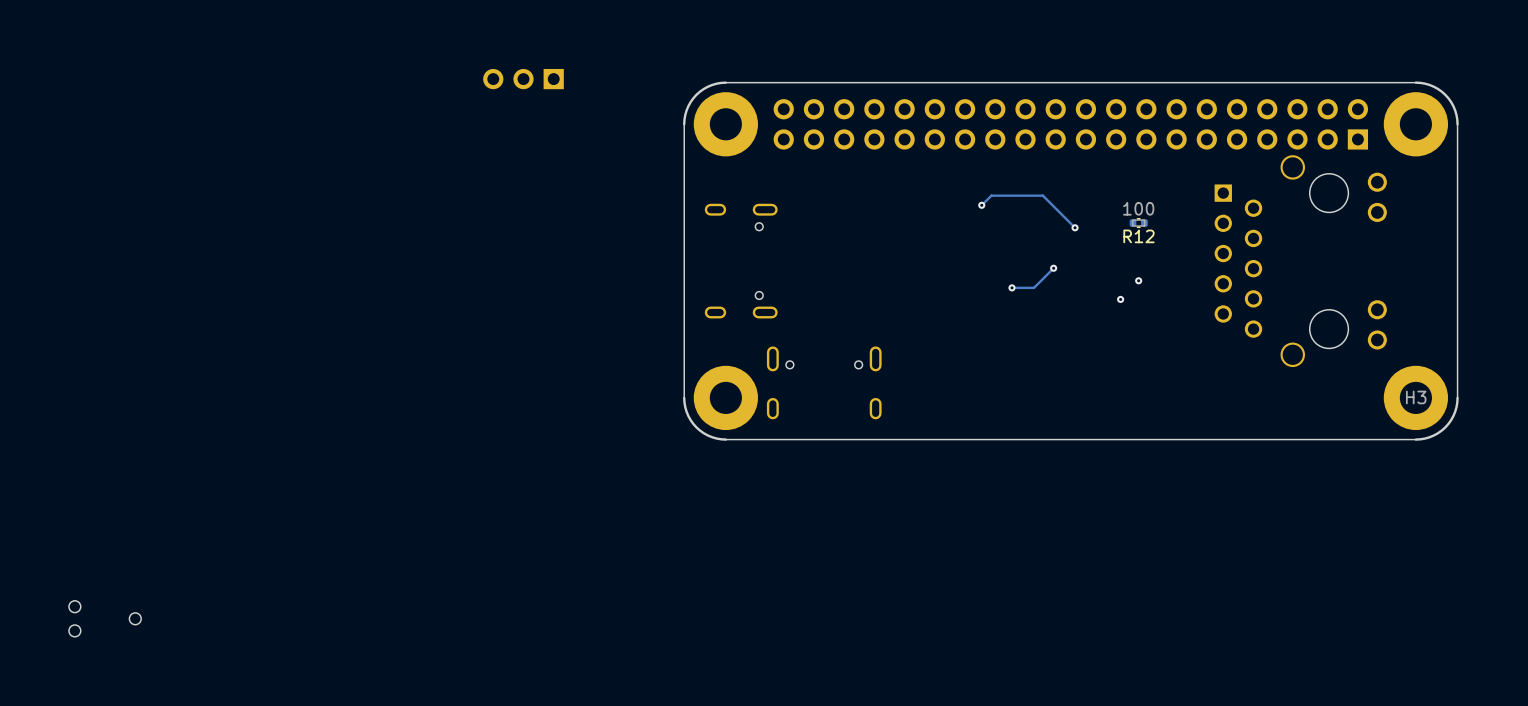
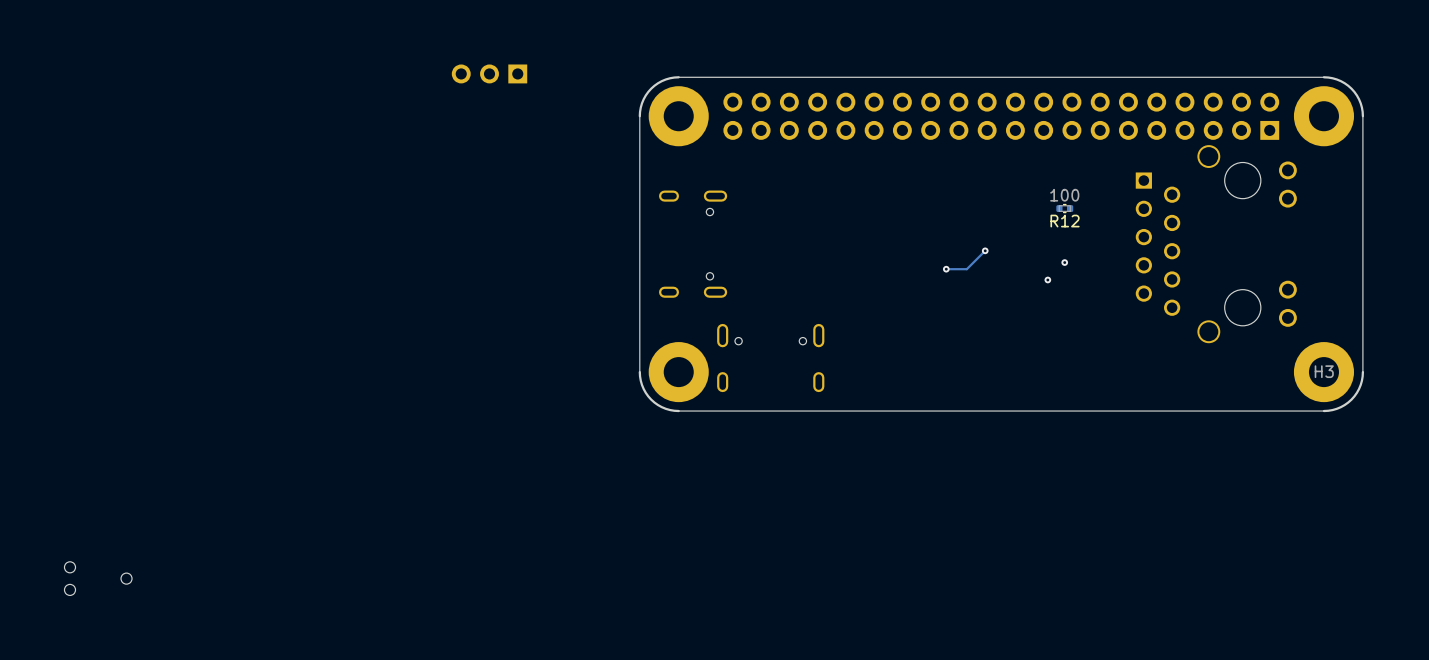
track: (981, 205) (991, 195) (1042, 195) (1075, 227) -> none
via: (981, 205) -> none
via: (1075, 227) -> none

